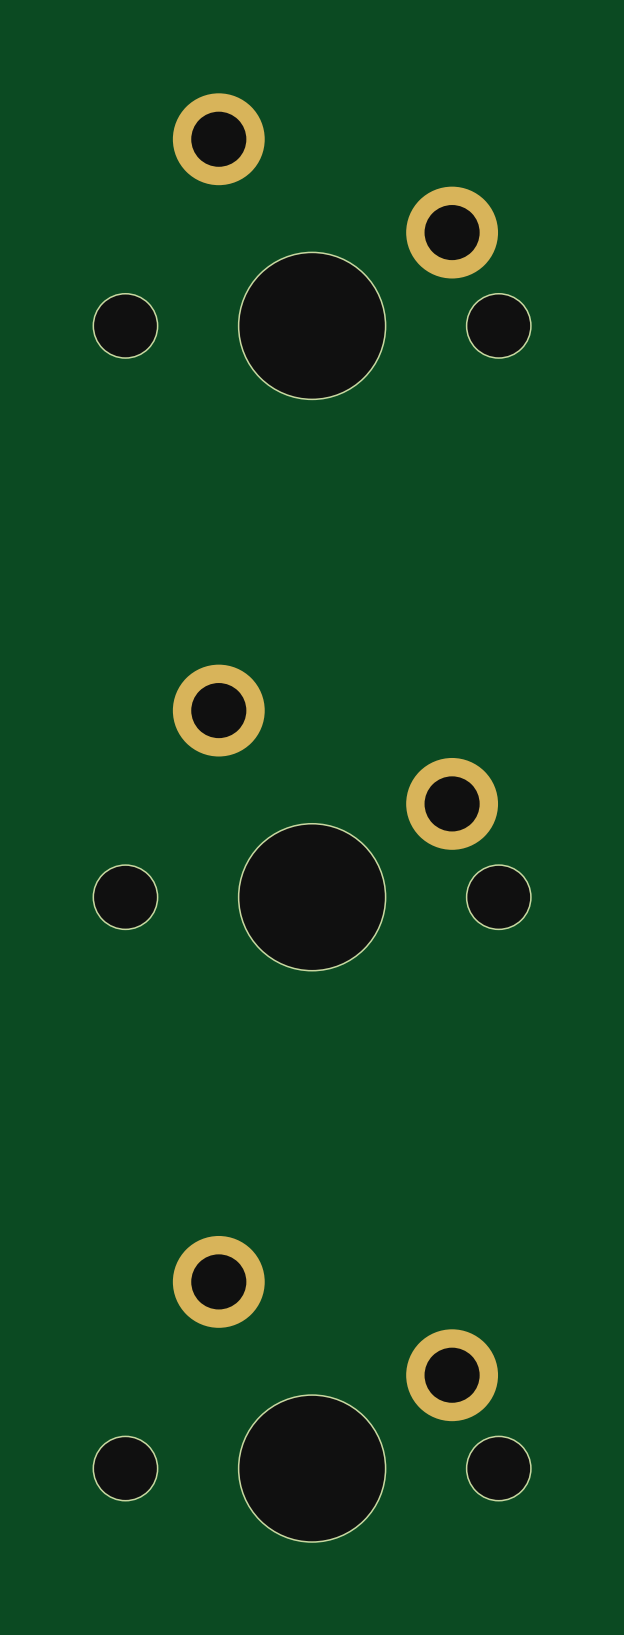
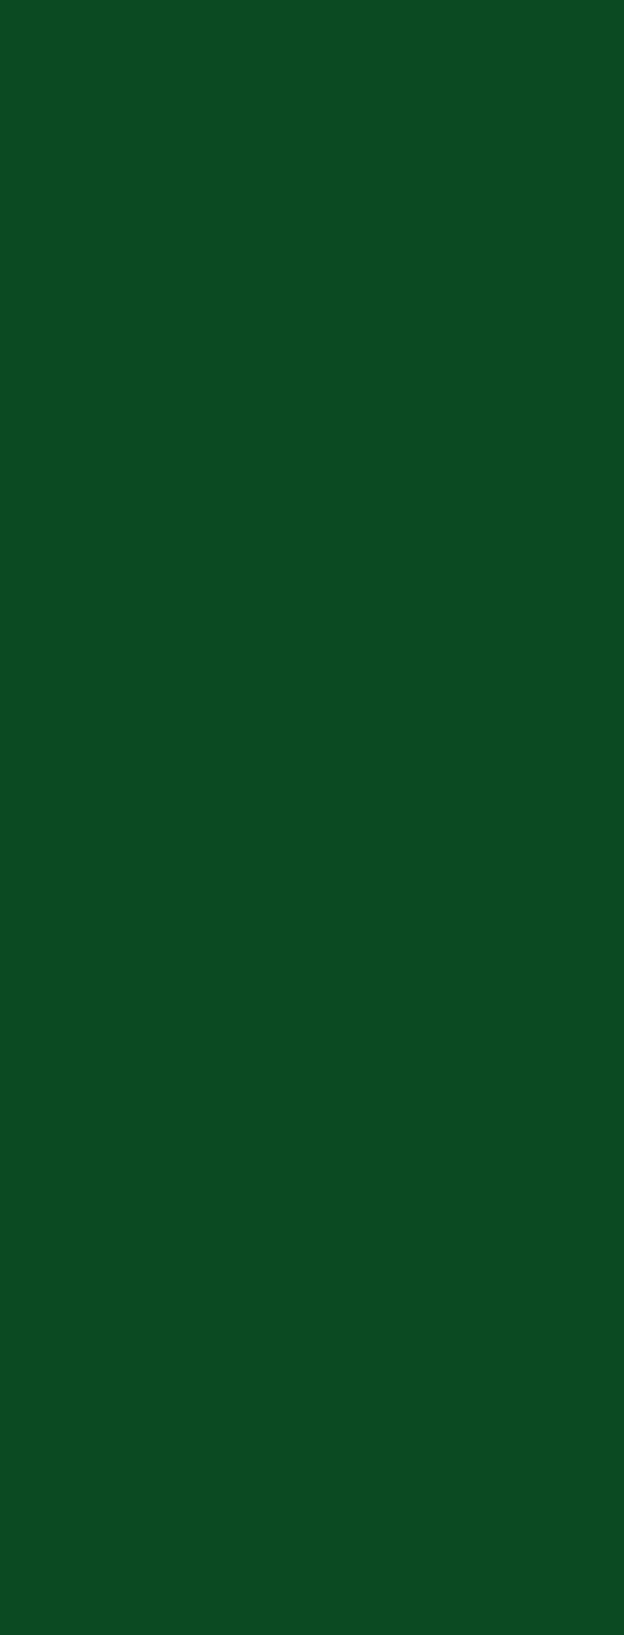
part: (312, 246) -> none
part: (312, 817) -> none
part: (312, 1389) -> none

